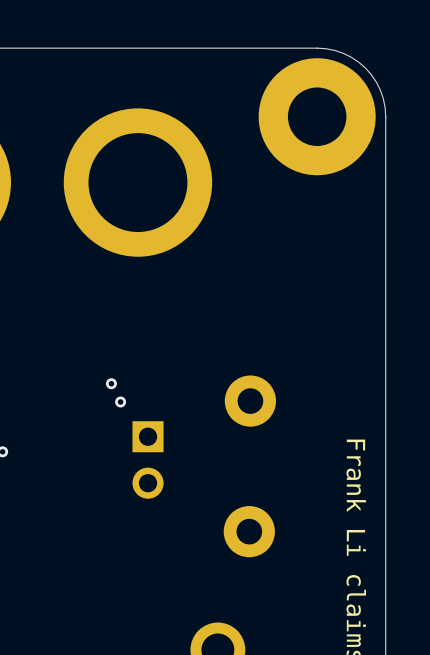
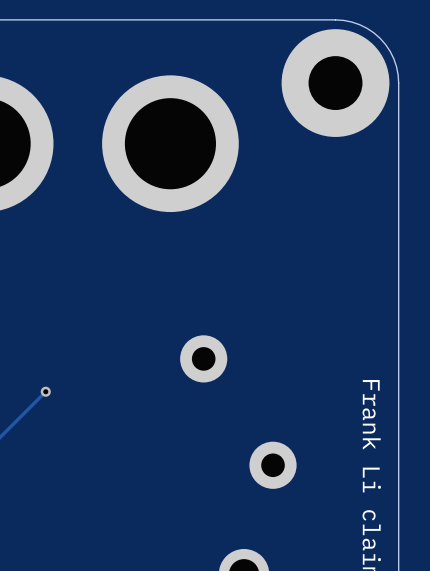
via: (111, 383) -> none
via: (120, 401) -> none
part position: (250, 401) -> (203, 358)
part: (148, 459) -> none

